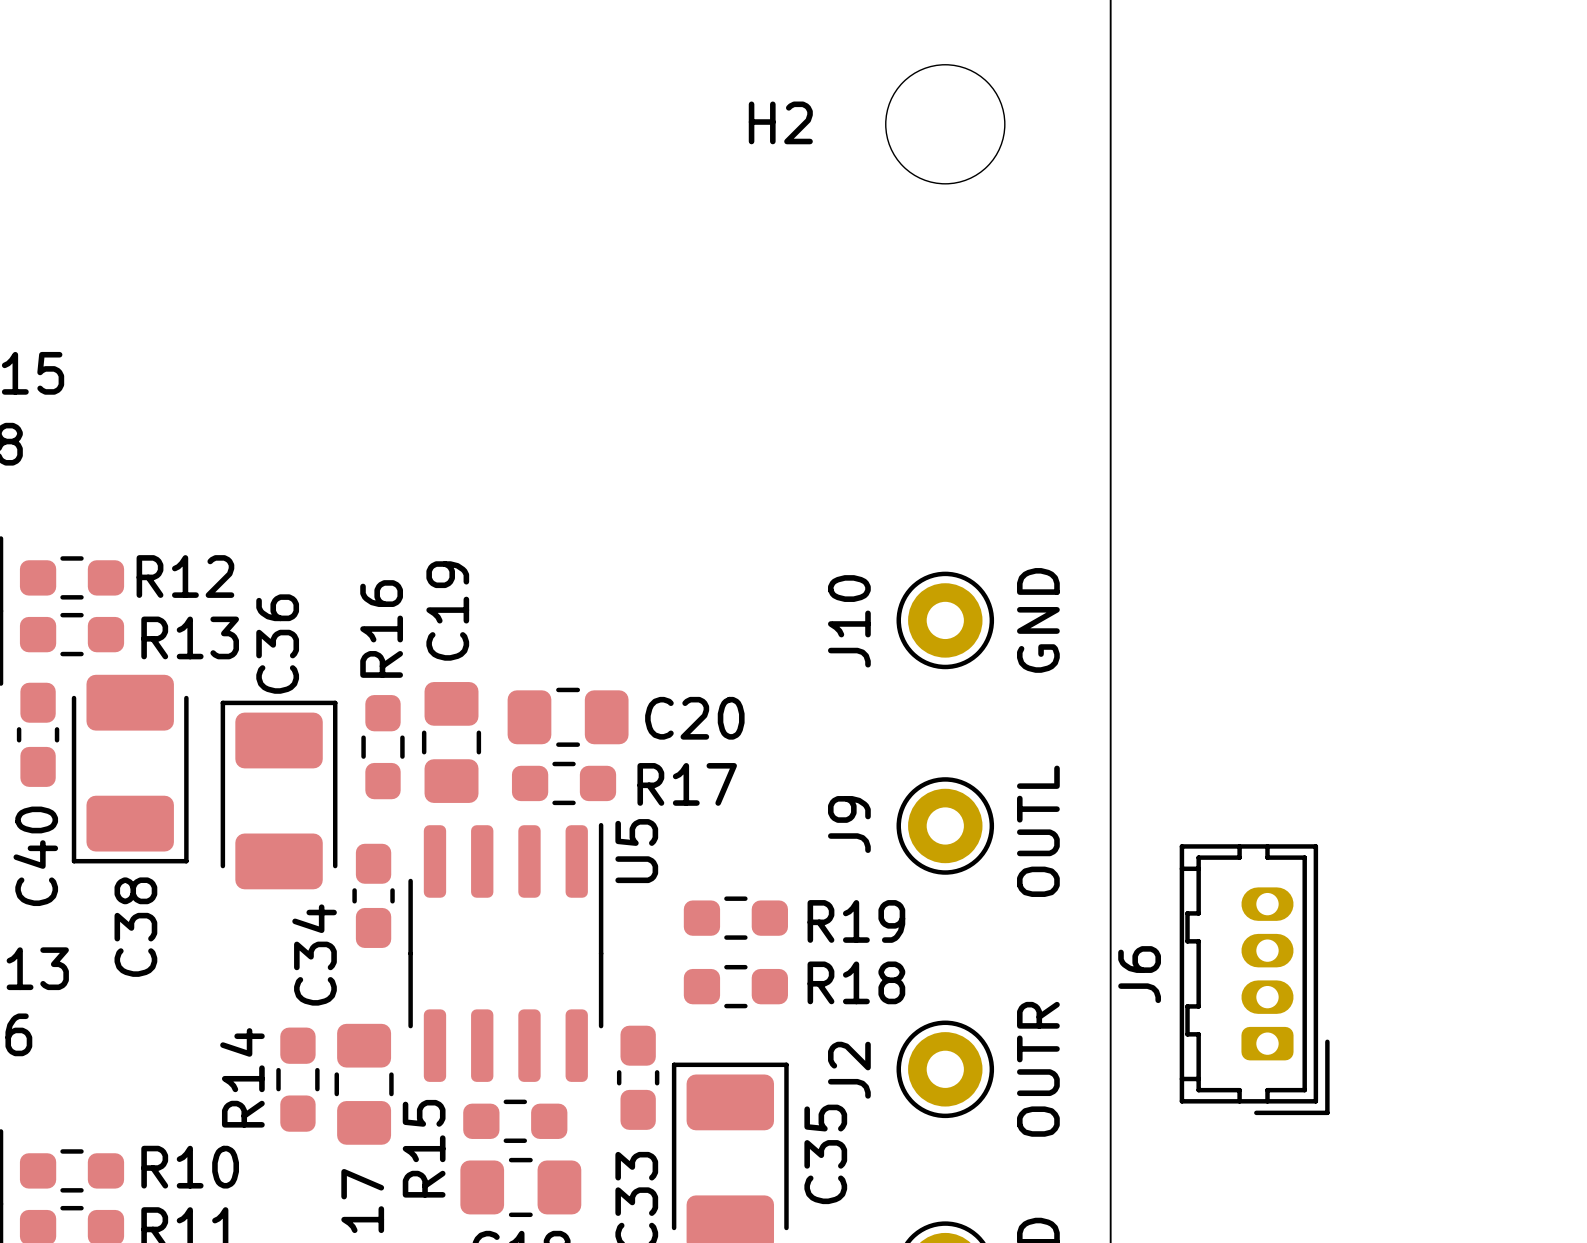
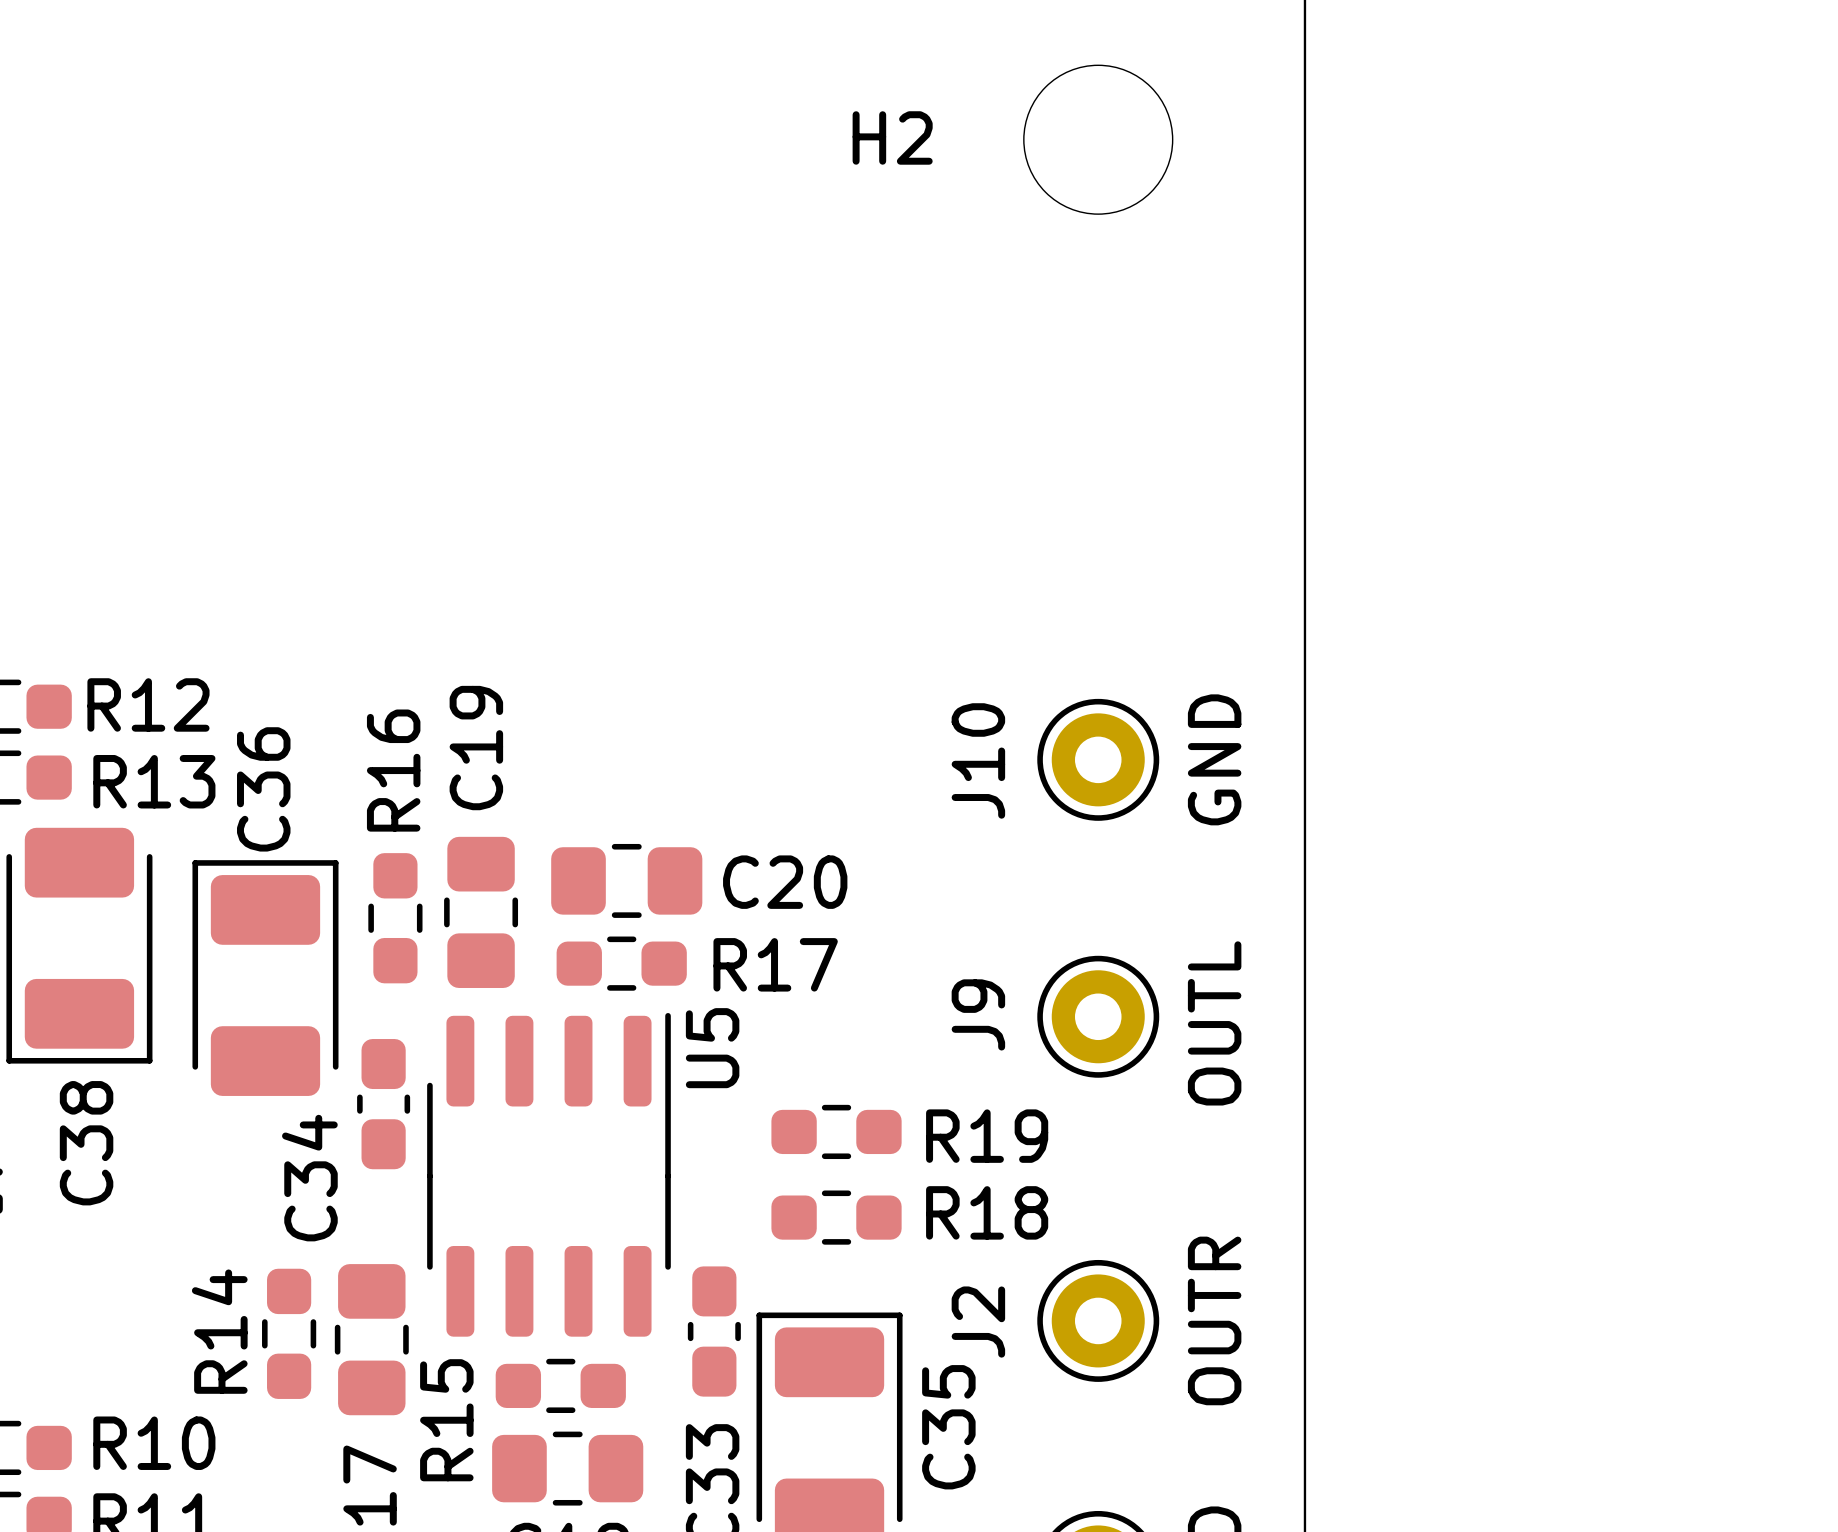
J6: (1254, 979) -> none

